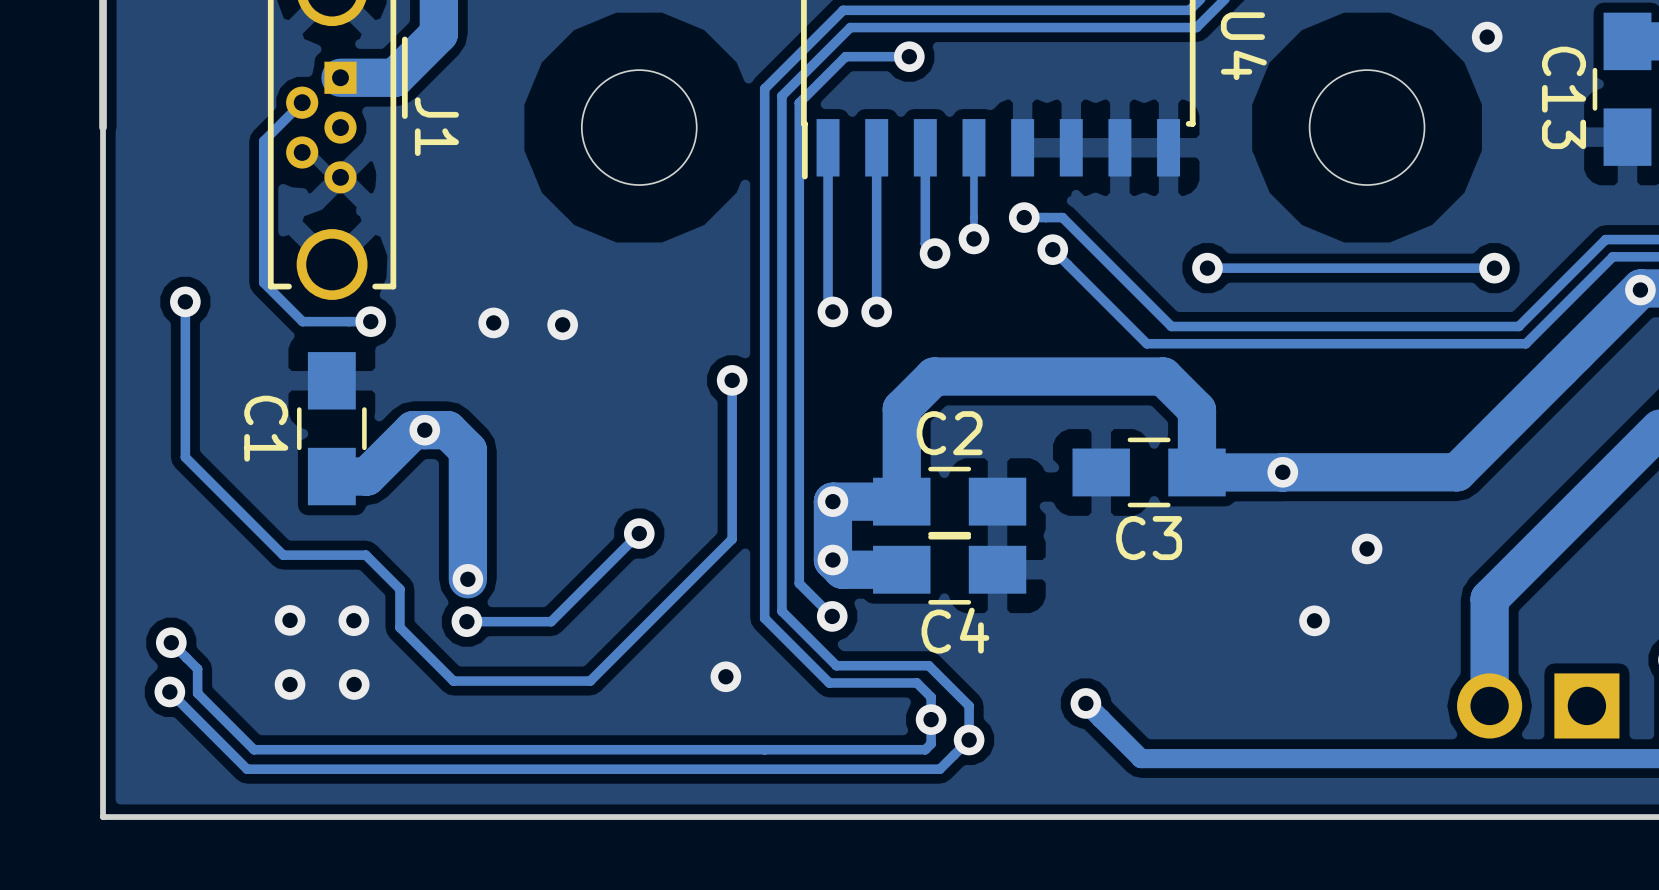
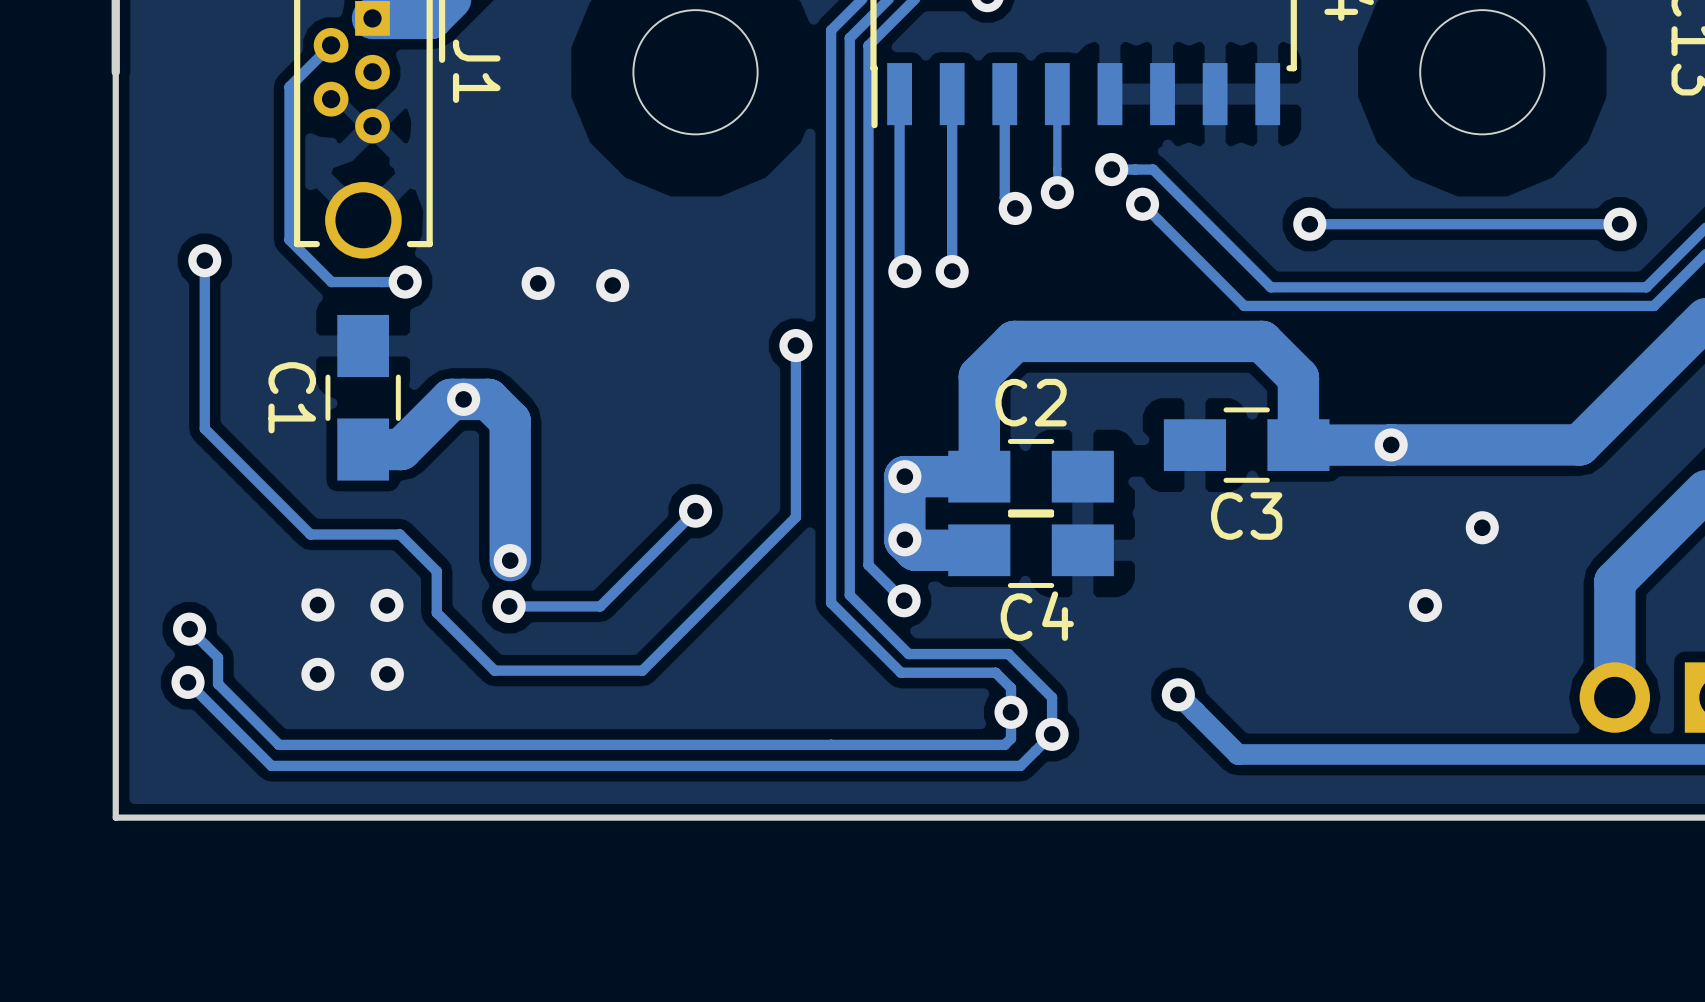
via: (725, 676) -> none

